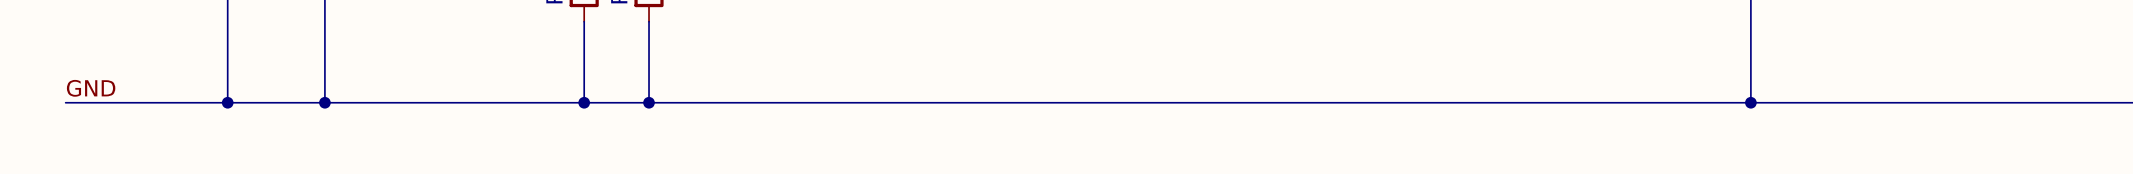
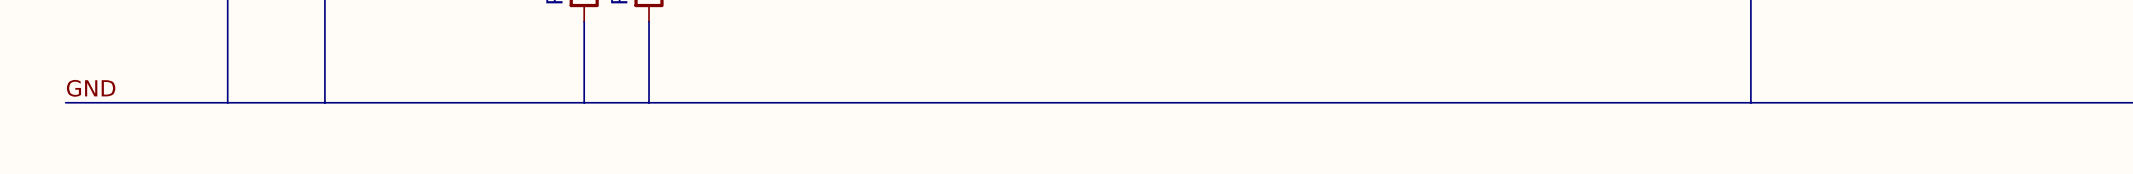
junction: (227, 102) -> none
junction: (324, 102) -> none
junction: (584, 102) -> none
junction: (649, 102) -> none
junction: (1750, 102) -> none

